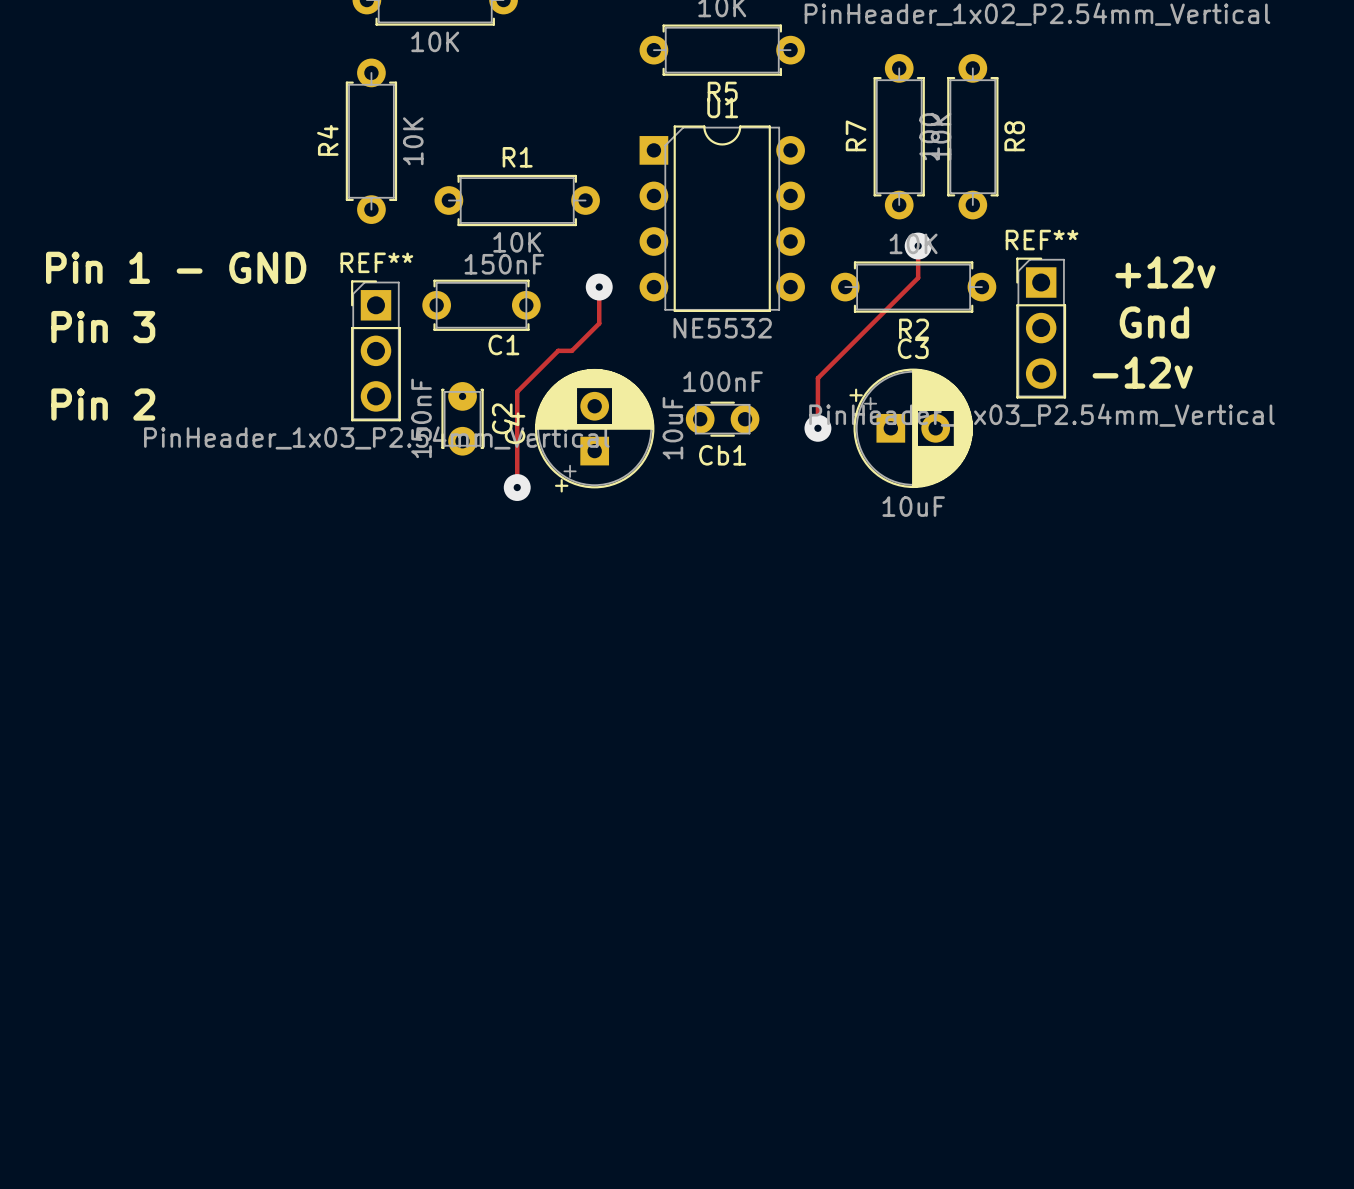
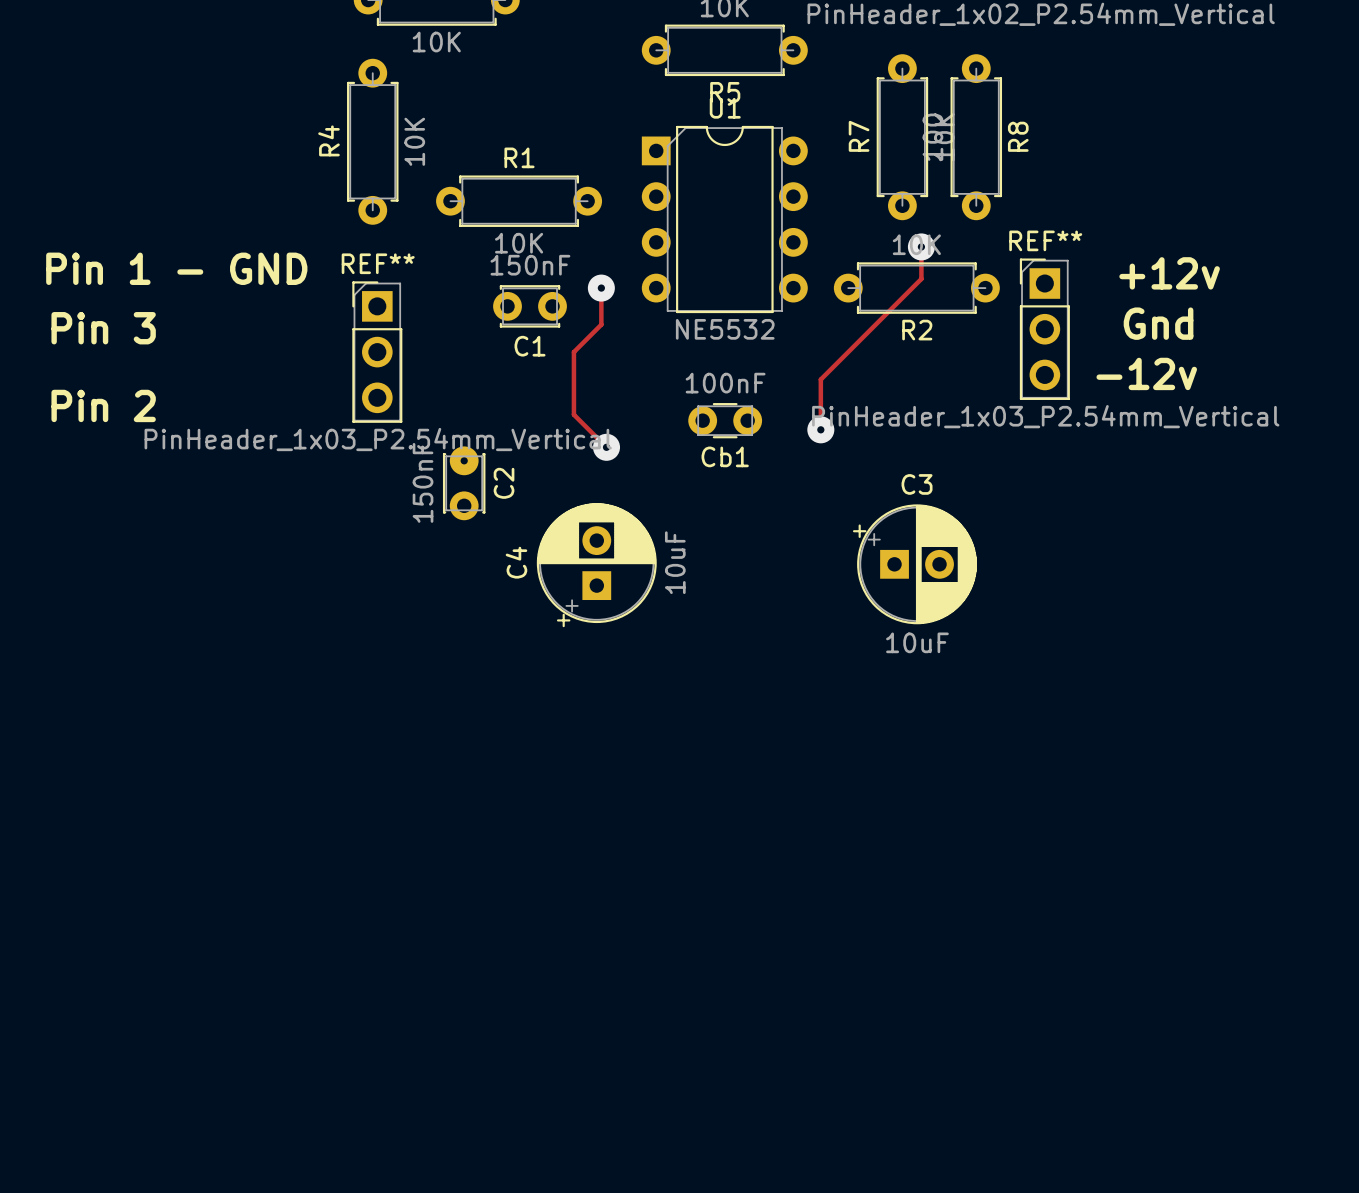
C1 footprint: [422, 279, 541, 331] -> [493, 285, 567, 328]
track: (571, 350) (558, 350) (517, 391) (517, 487) -> (573, 352) (573, 414) (606, 447)
C2 position: (462, 418) -> (464, 483)
C3 position: (911, 428) -> (914, 564)
C4 position: (594, 430) -> (596, 565)
via position: (517, 487) -> (606, 447)

